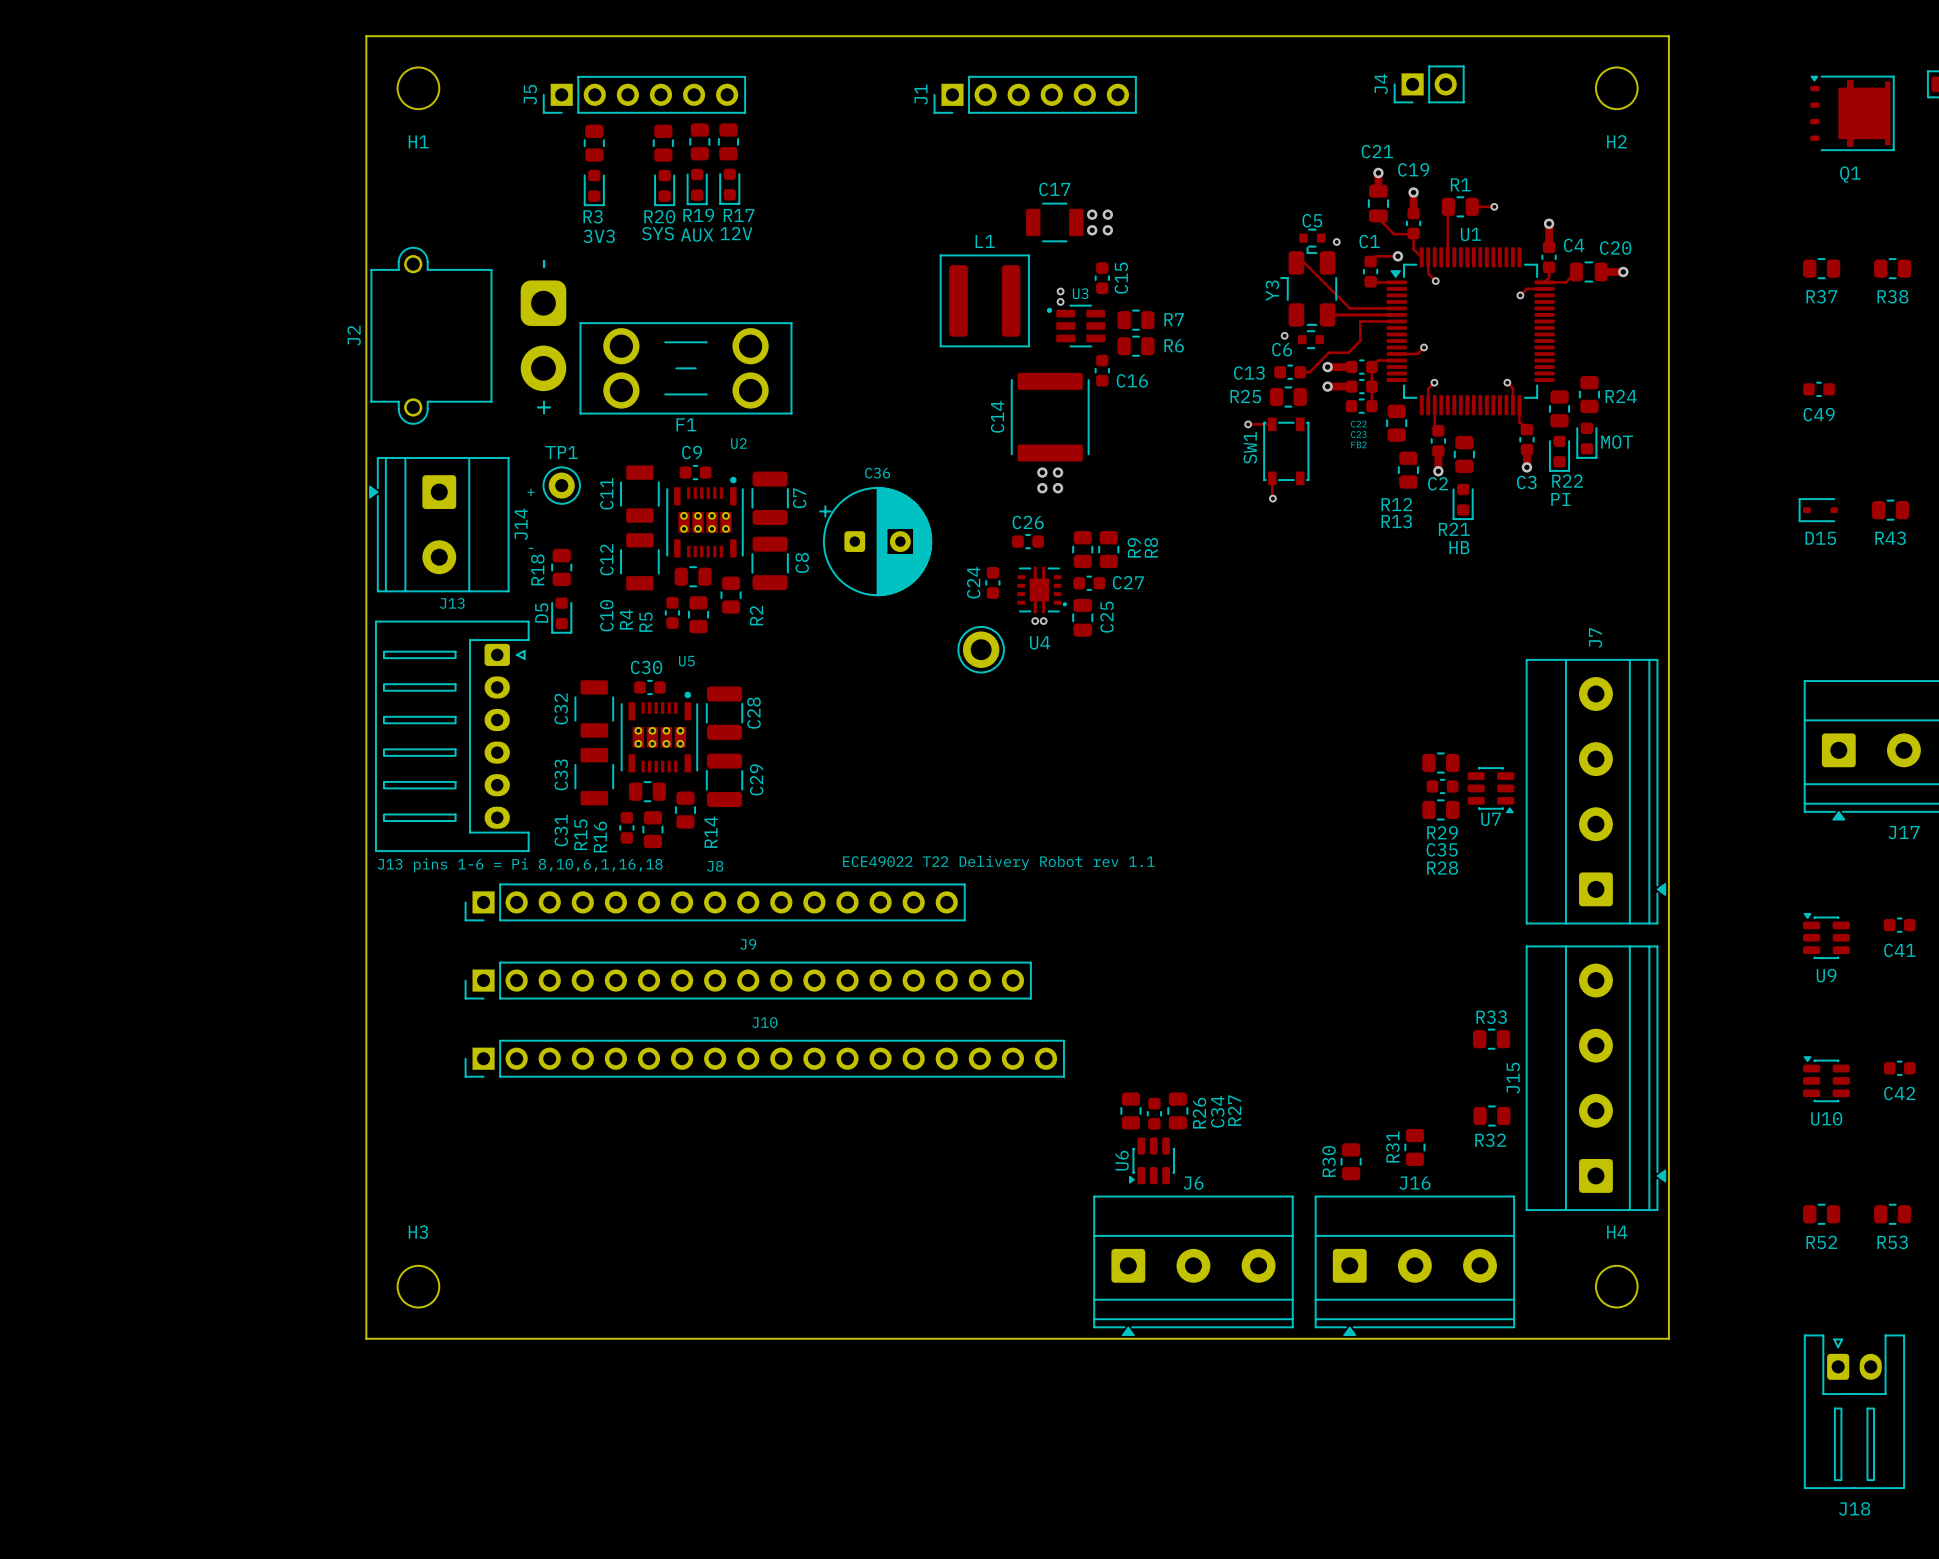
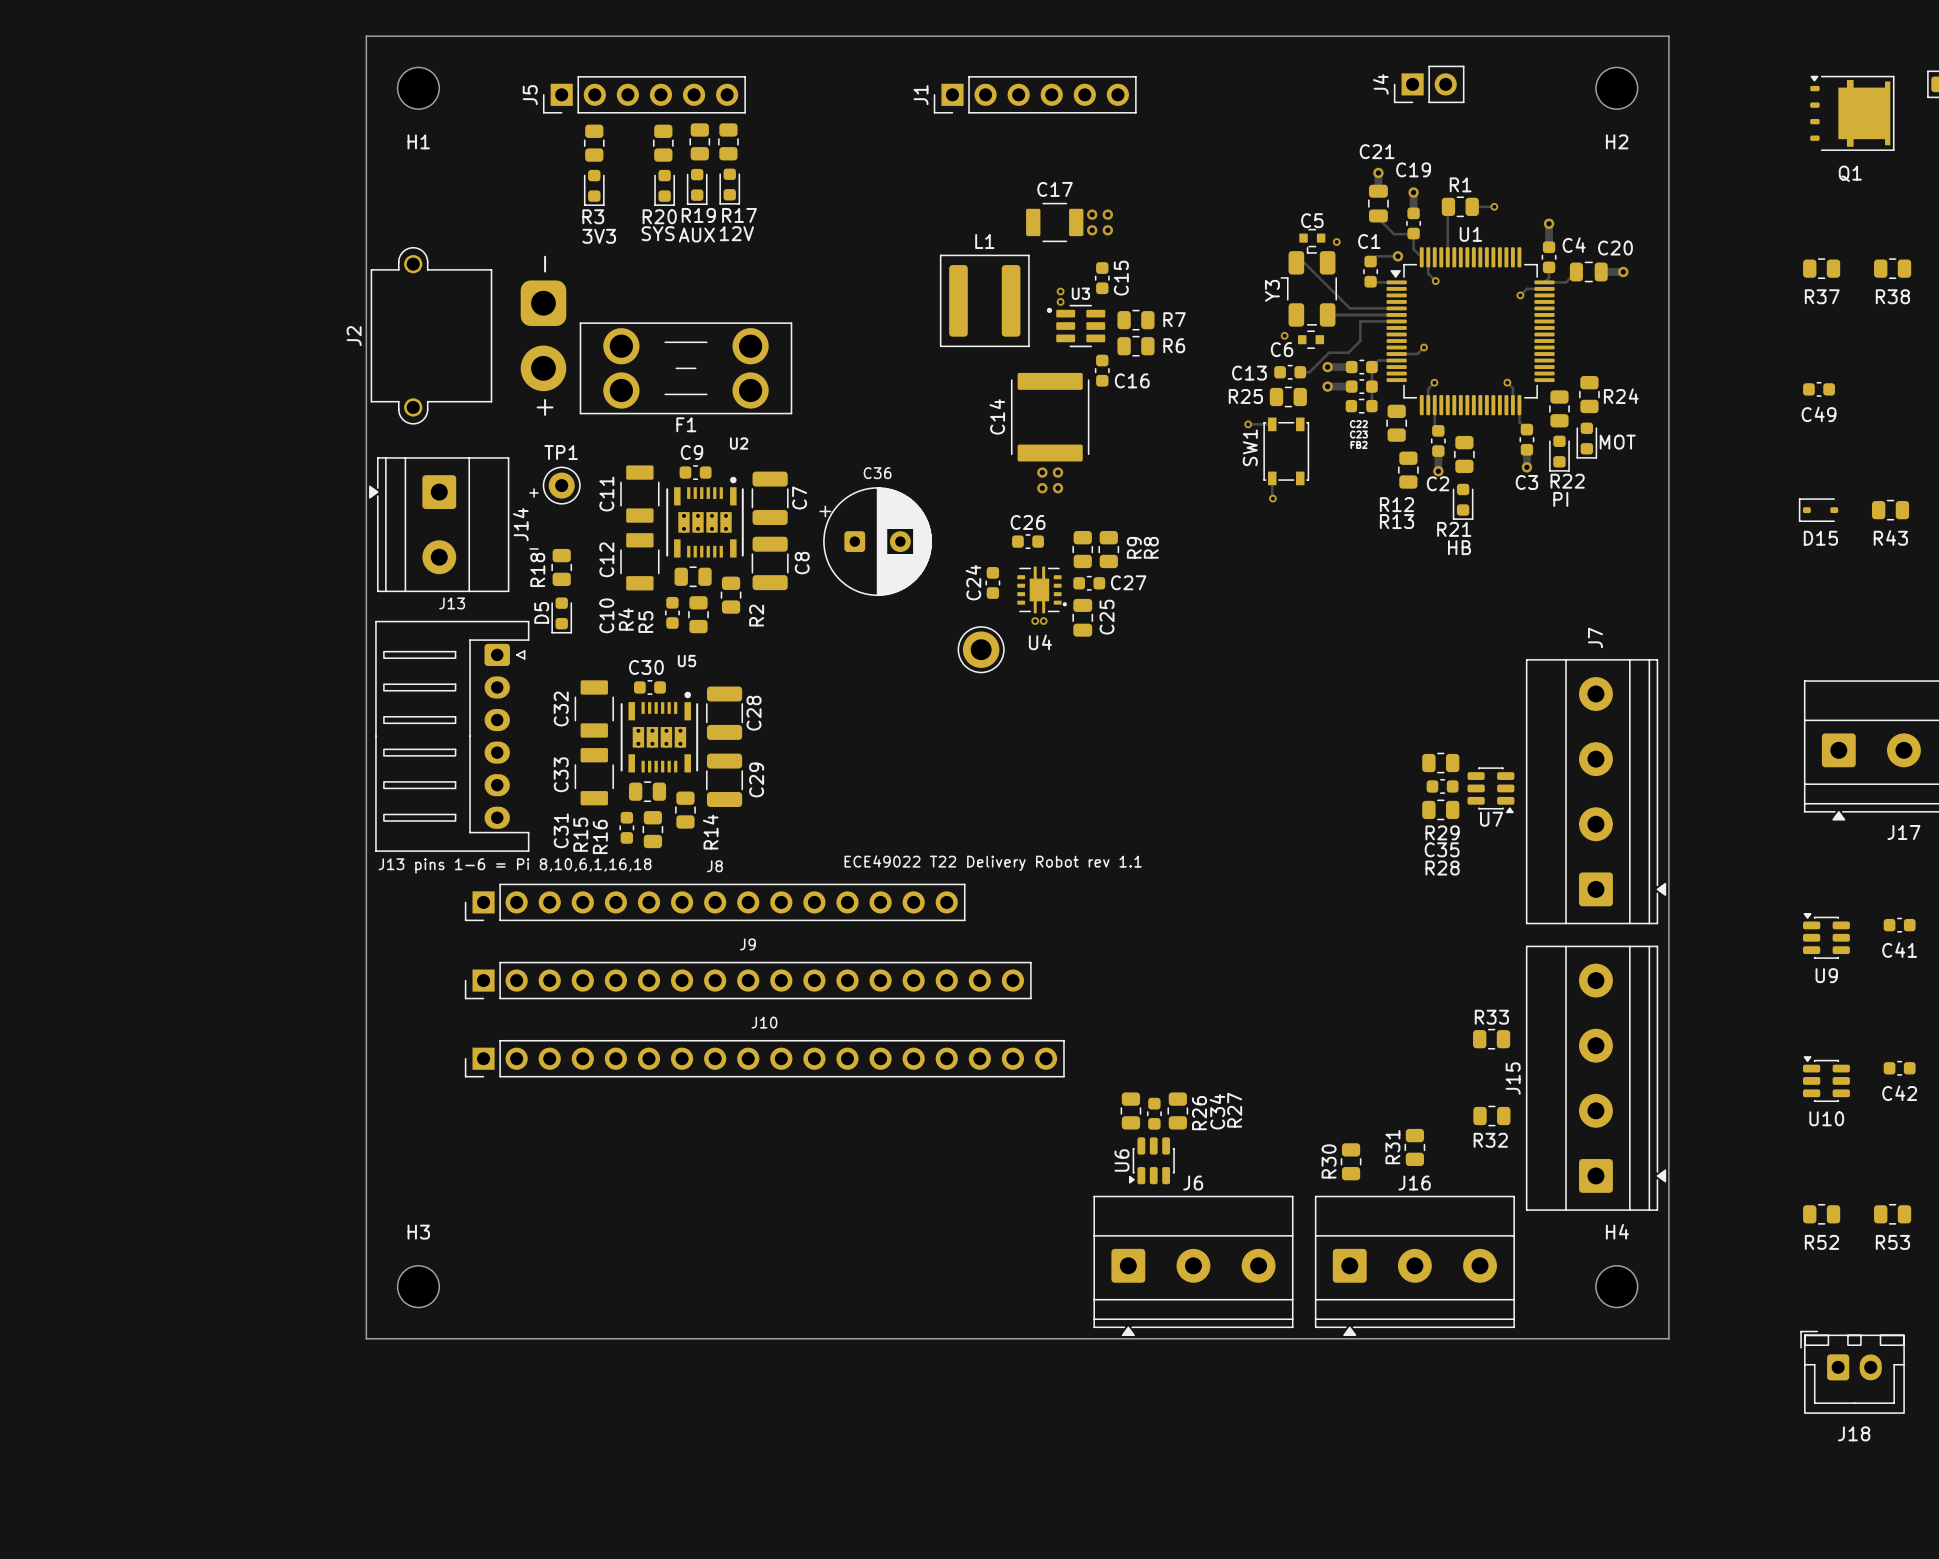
J18 footprint: [1804, 1334, 1905, 1489] -> [1800, 1330, 1905, 1414]
J18 name position: J18 (1854, 1508) -> J18 (1854, 1433)

